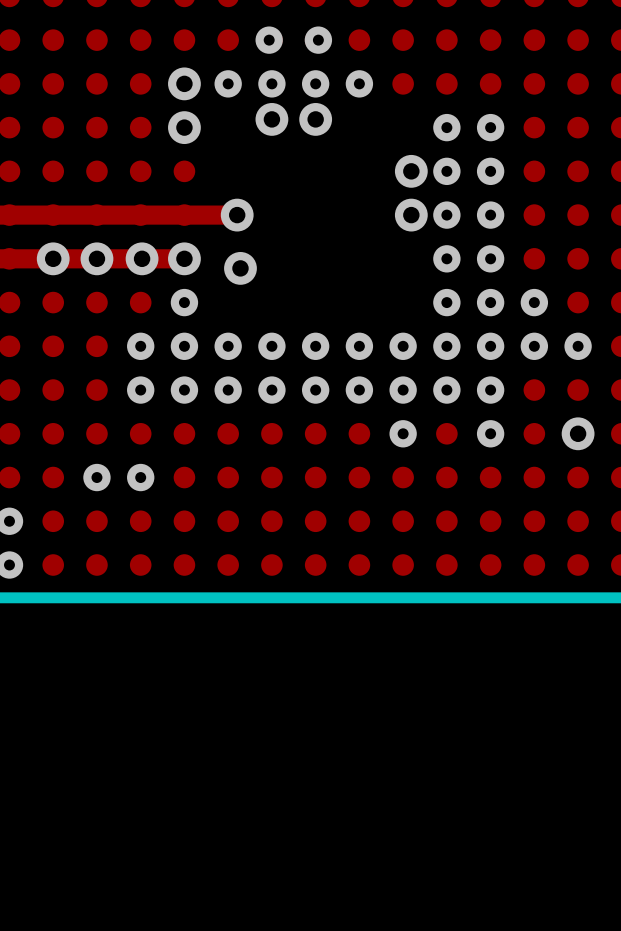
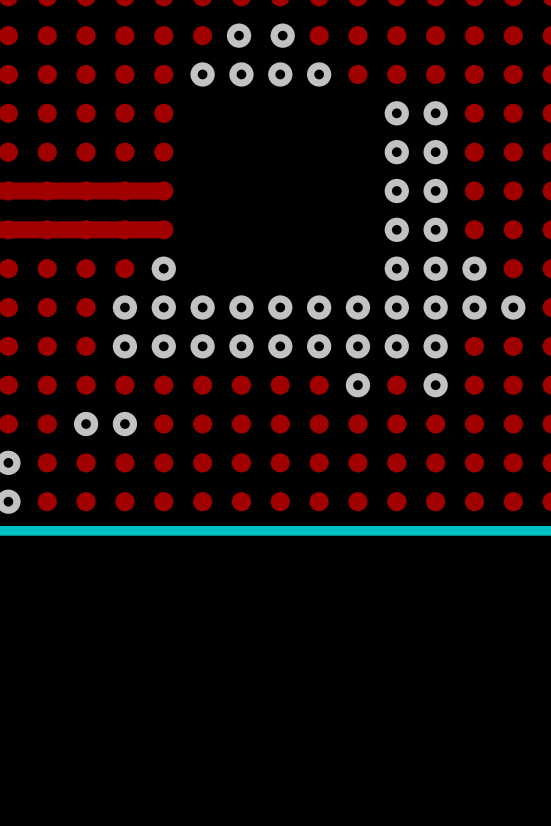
via: (184, 83) -> none
via: (271, 119) -> none
via: (315, 119) -> none
via: (184, 127) -> none
via: (411, 171) -> none
track: (184, 215) (237, 215) -> none
via: (237, 215) -> none
via: (411, 215) -> none
via: (53, 258) -> none
via: (96, 258) -> none
via: (142, 258) -> none
via: (184, 258) -> none
via: (240, 268) -> none
via: (578, 433) -> none

